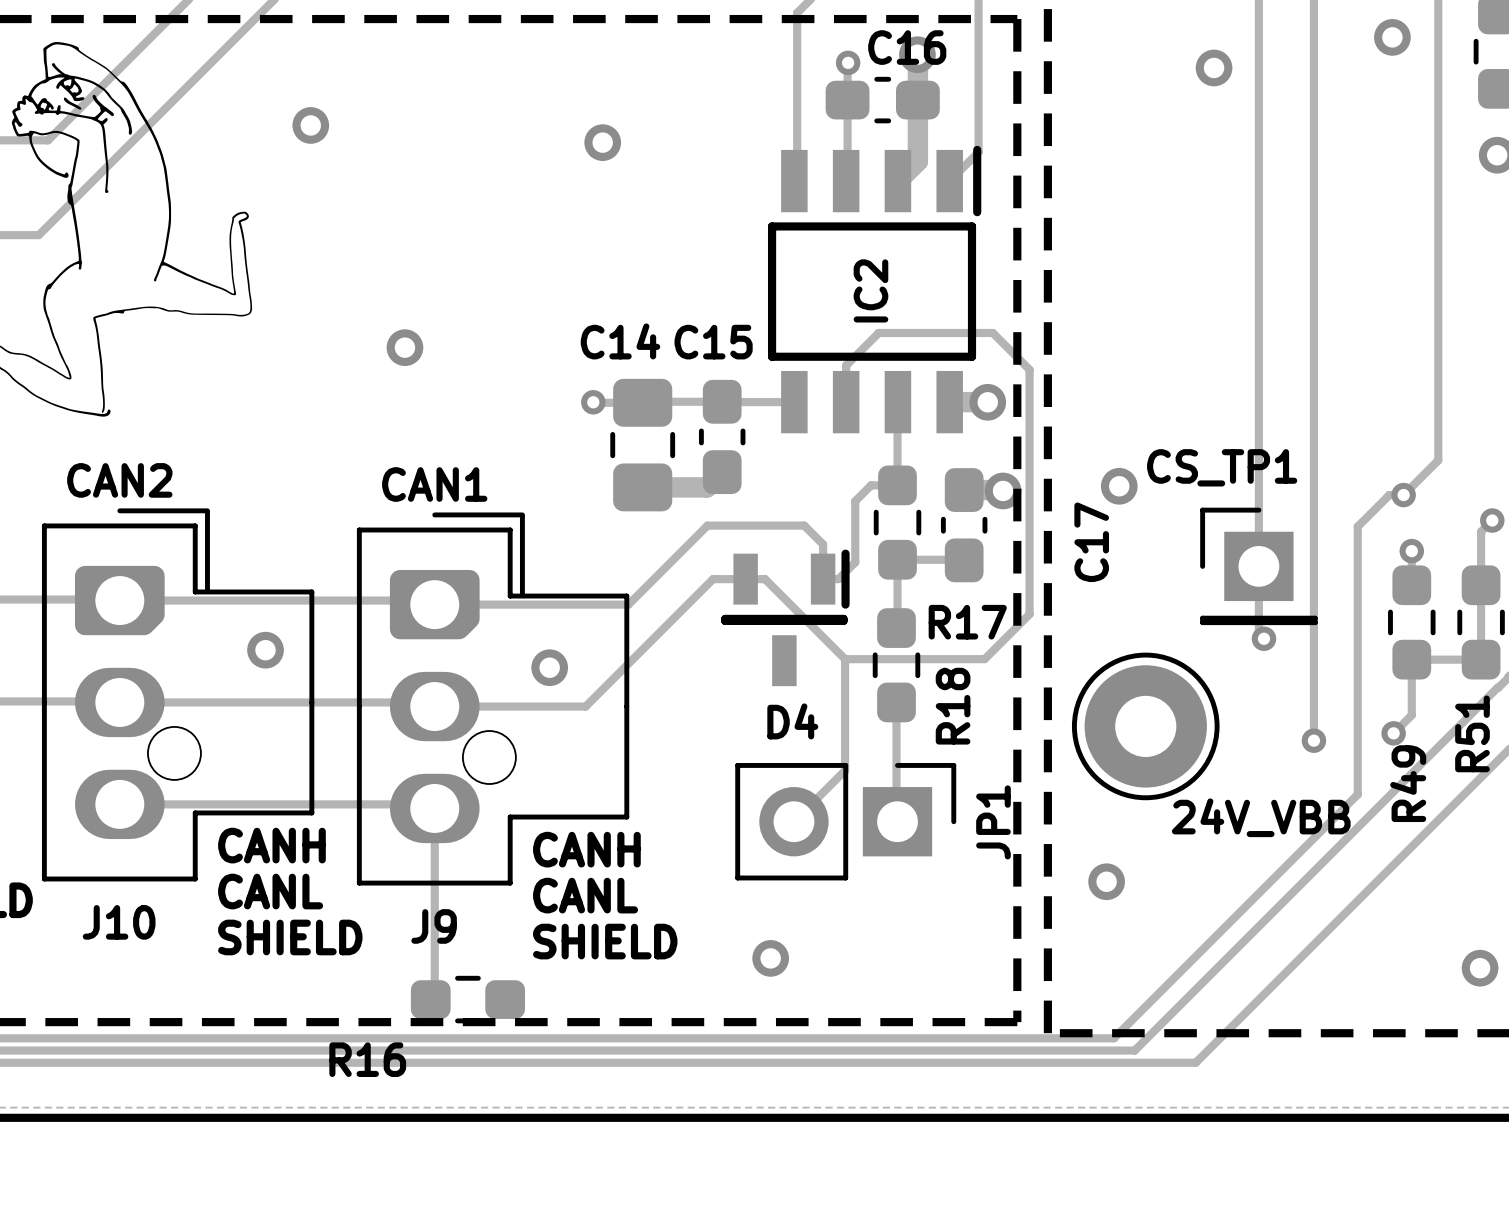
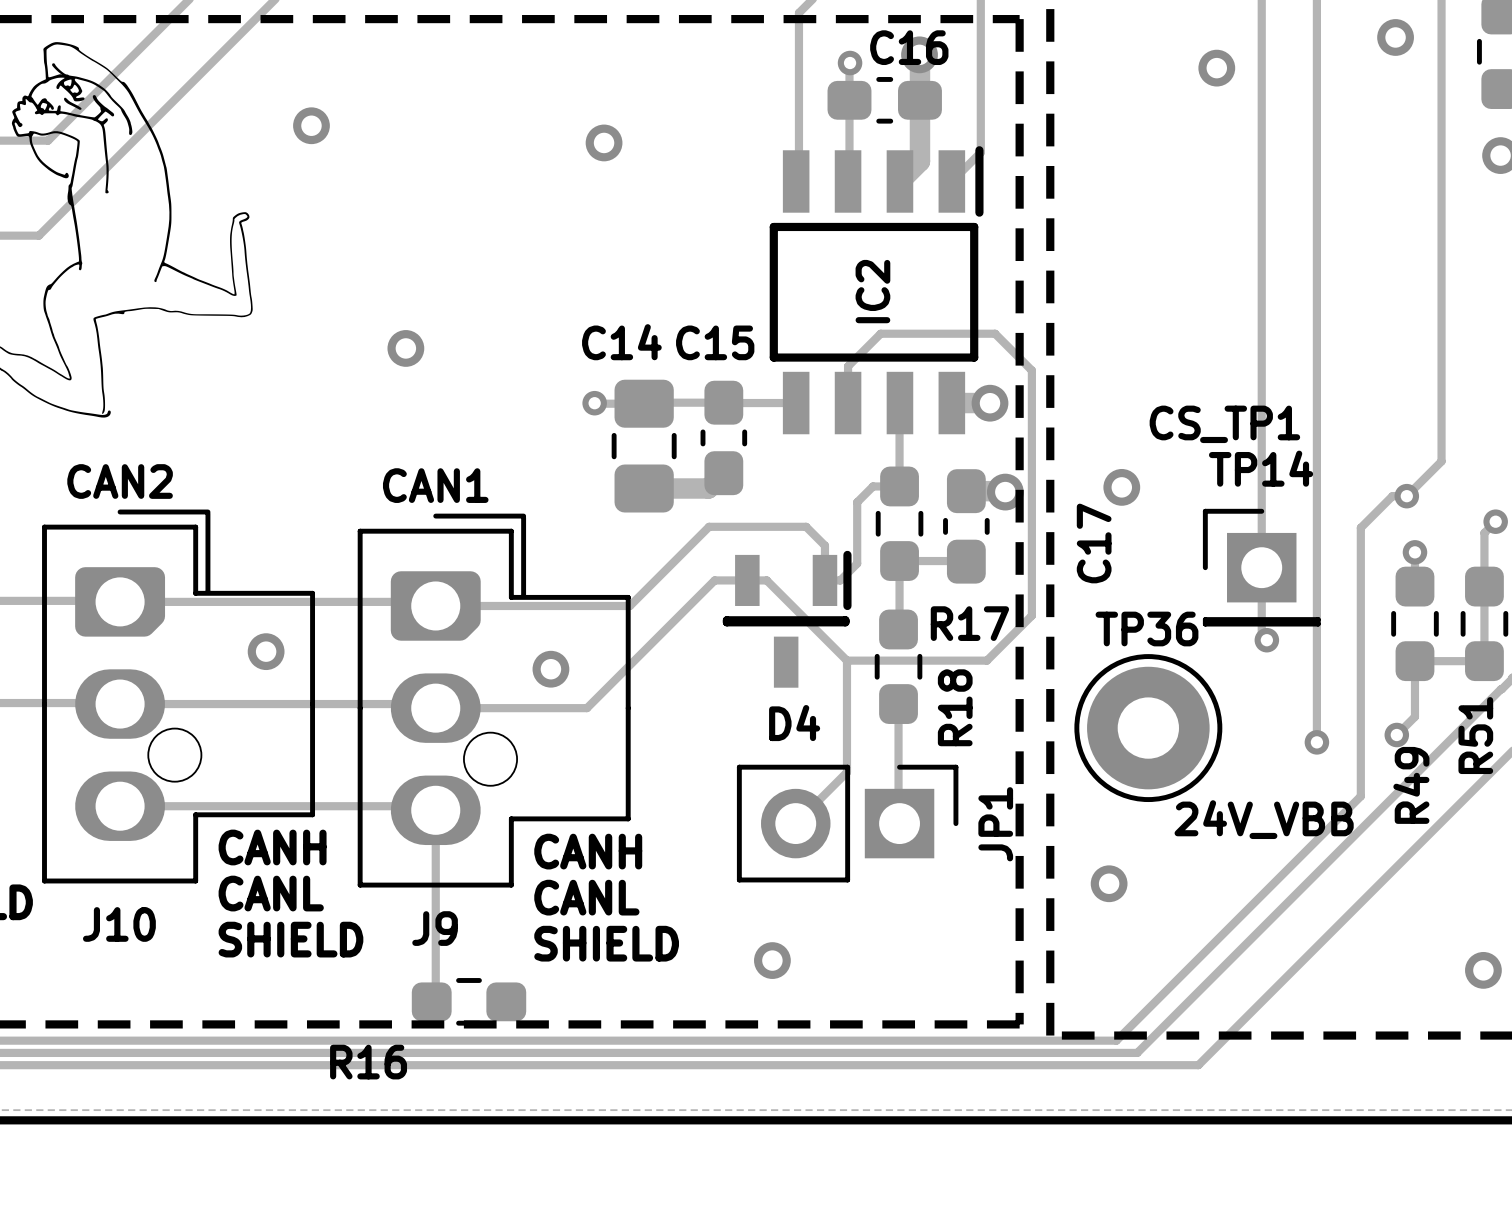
TP14 value position: CS_TP1 (1222, 467) -> CS_TP1 (1224, 424)
TP14 name: none -> TP14 (1261, 468)
TP36 name: none -> TP36 (1146, 629)

